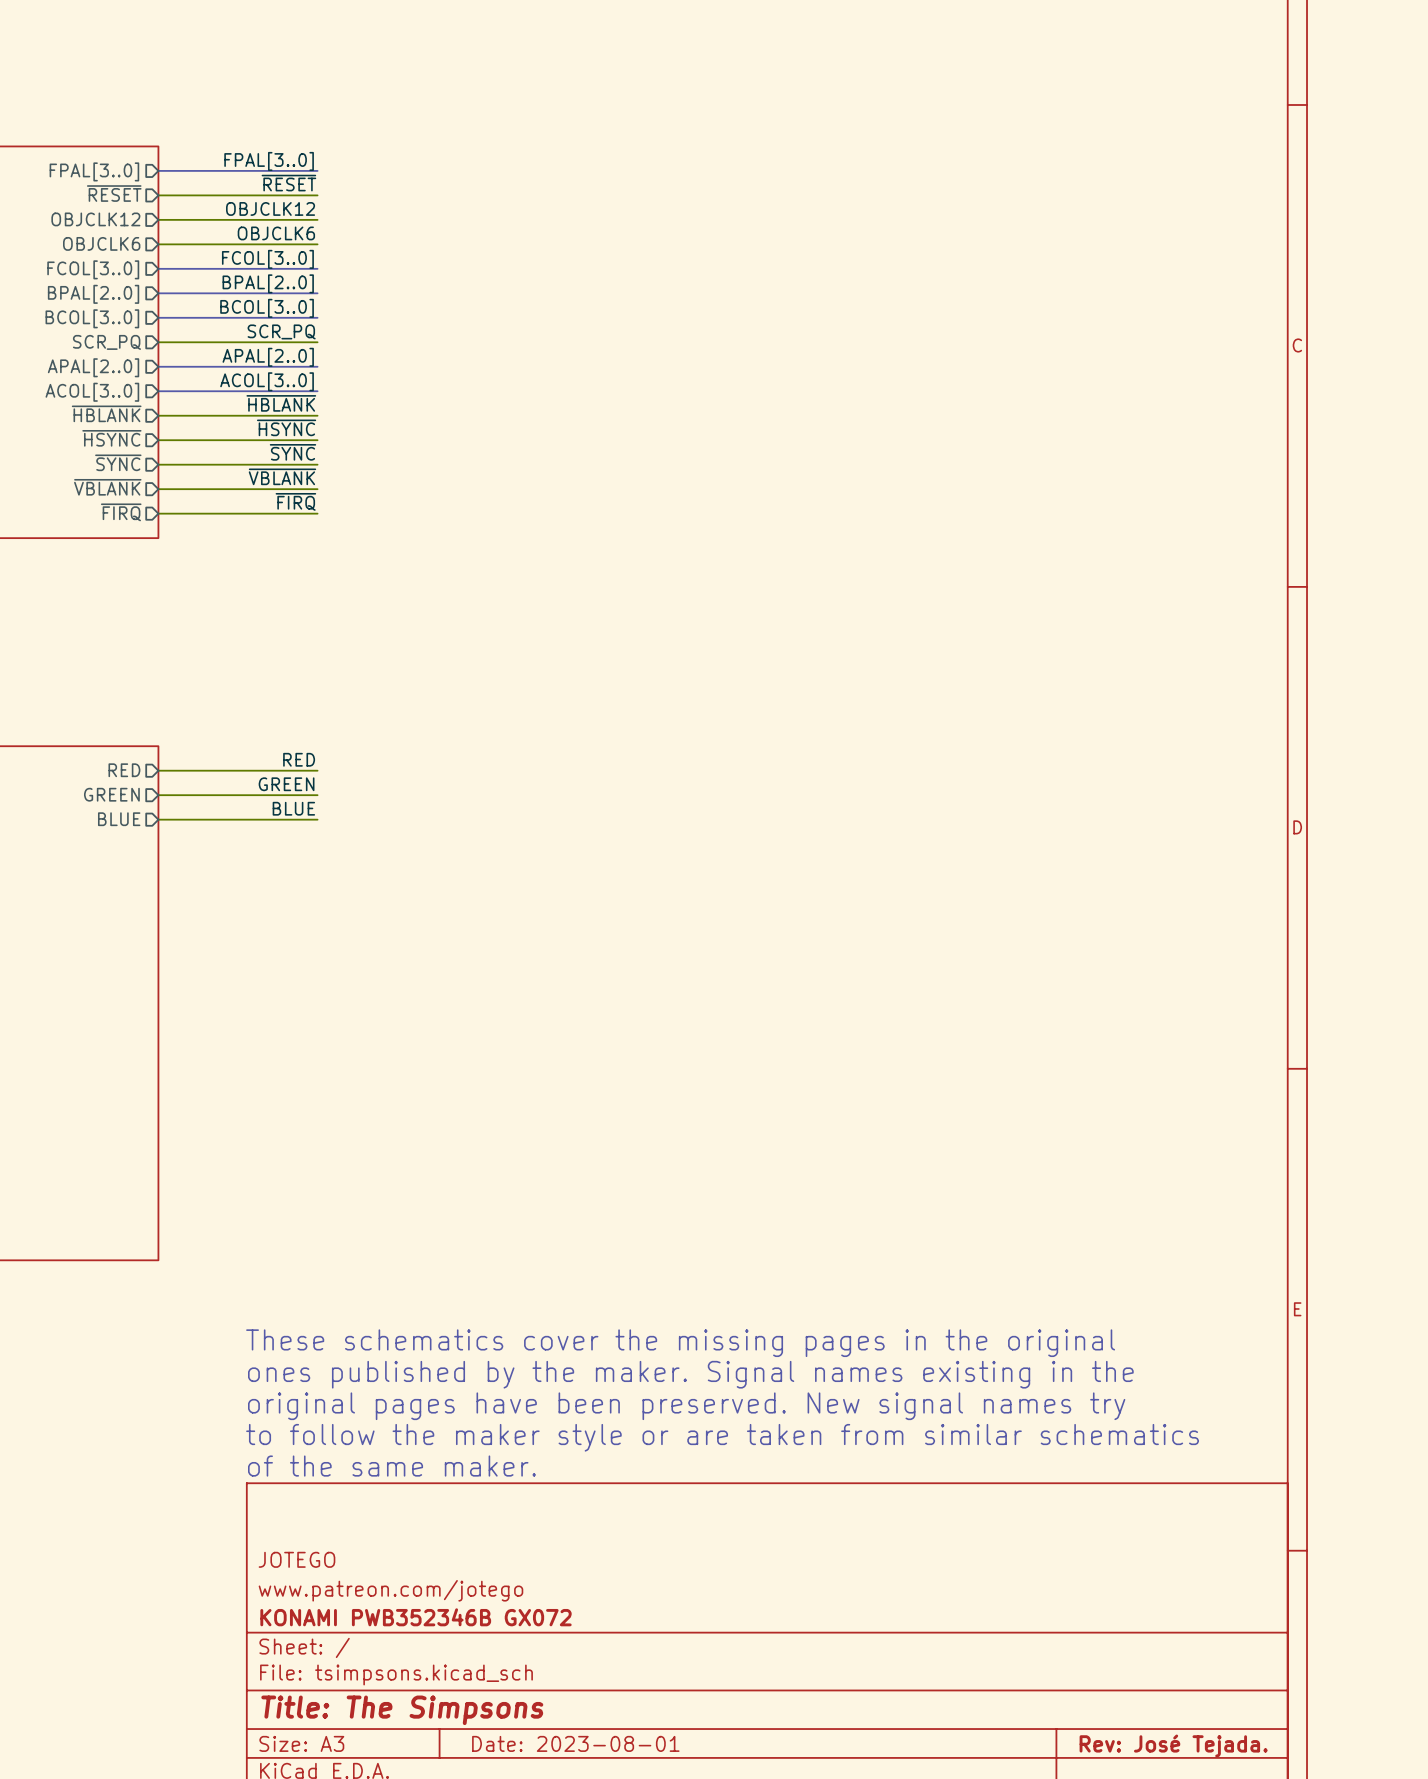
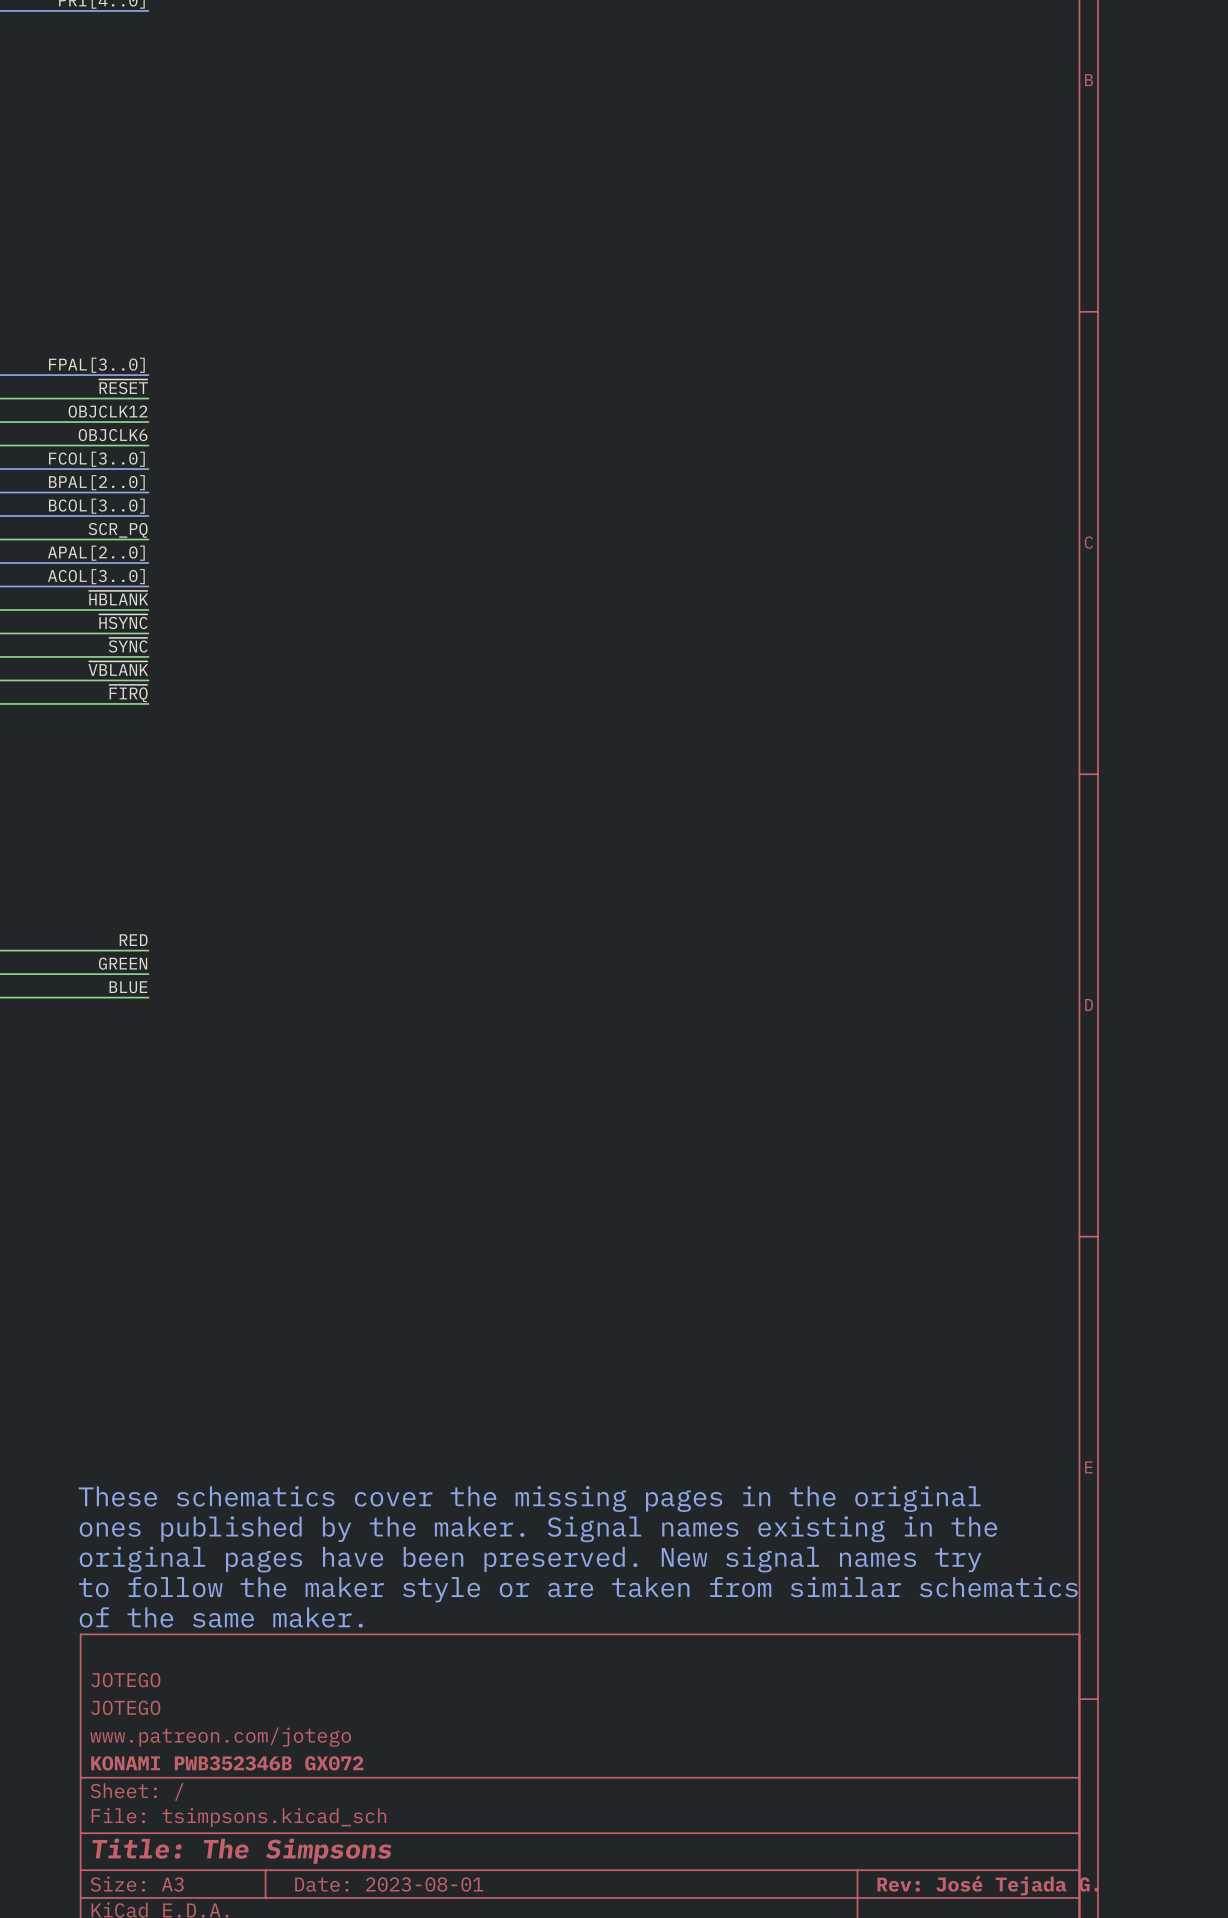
title block: none -> JOTEGO (125, 1680)
title block: Rev: José Tejada. (1173, 1745) -> Rev: José Tejada G. (988, 1885)

